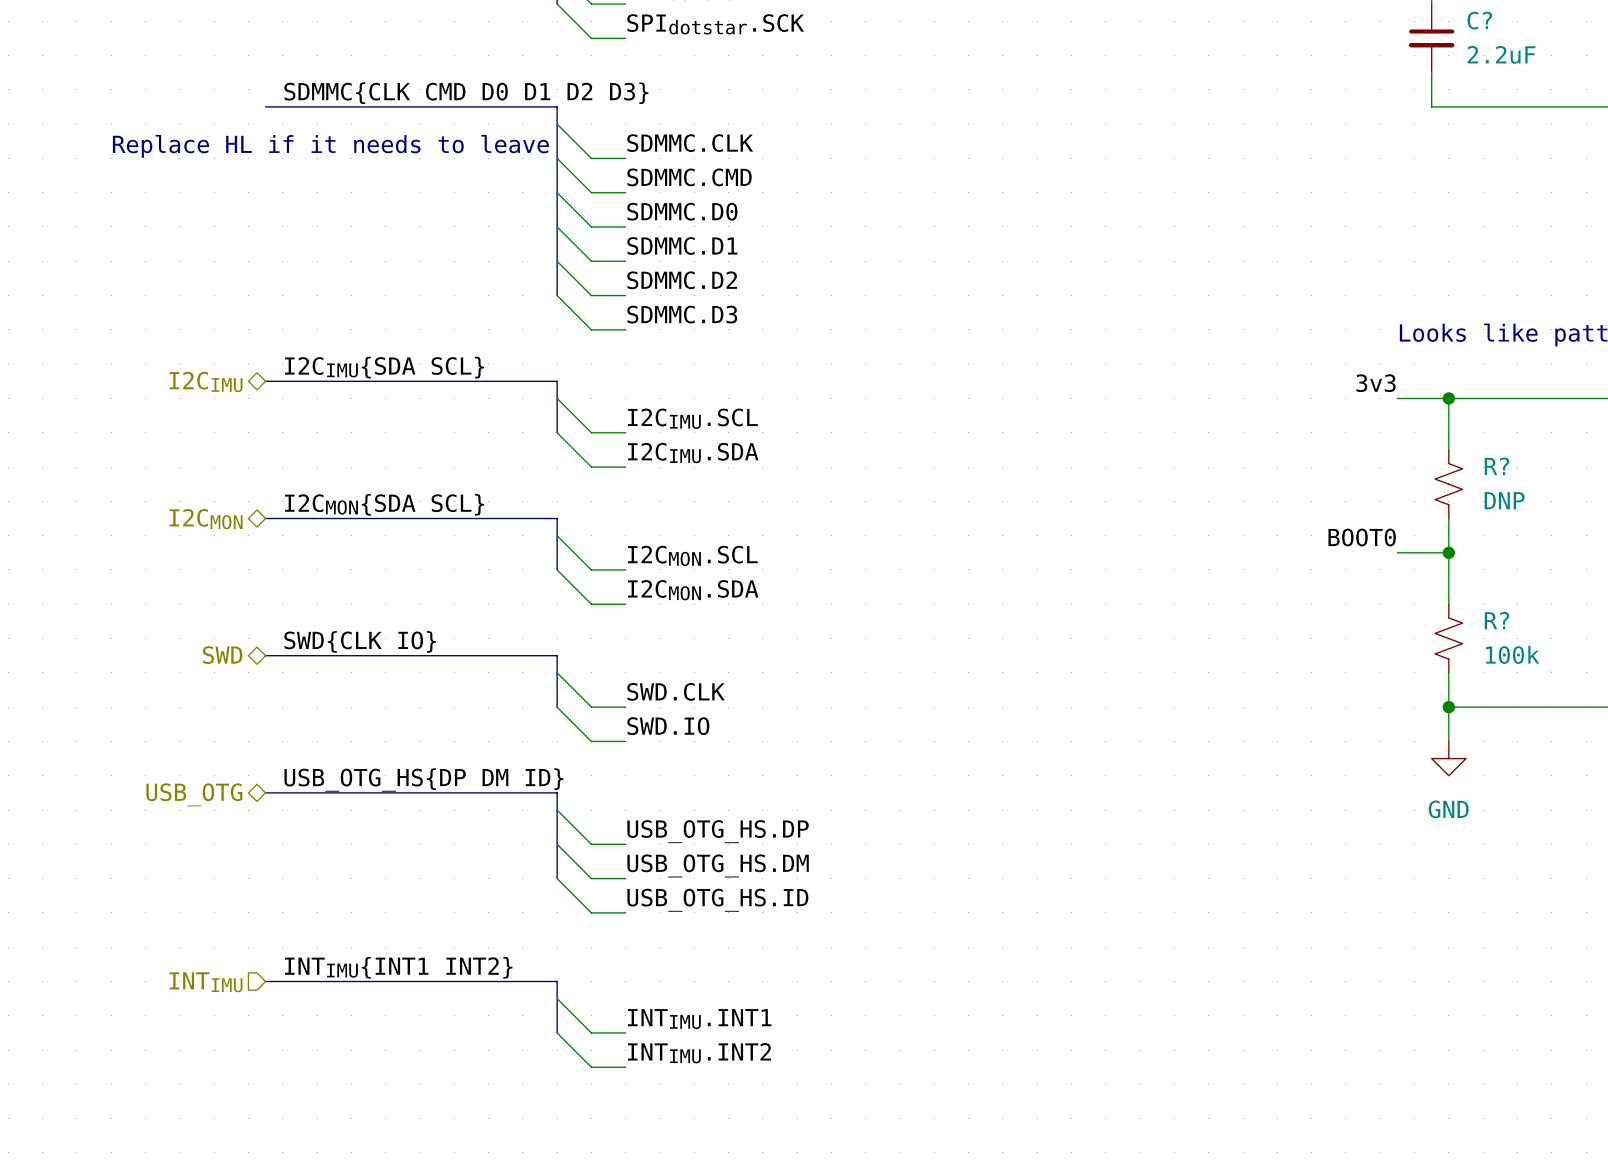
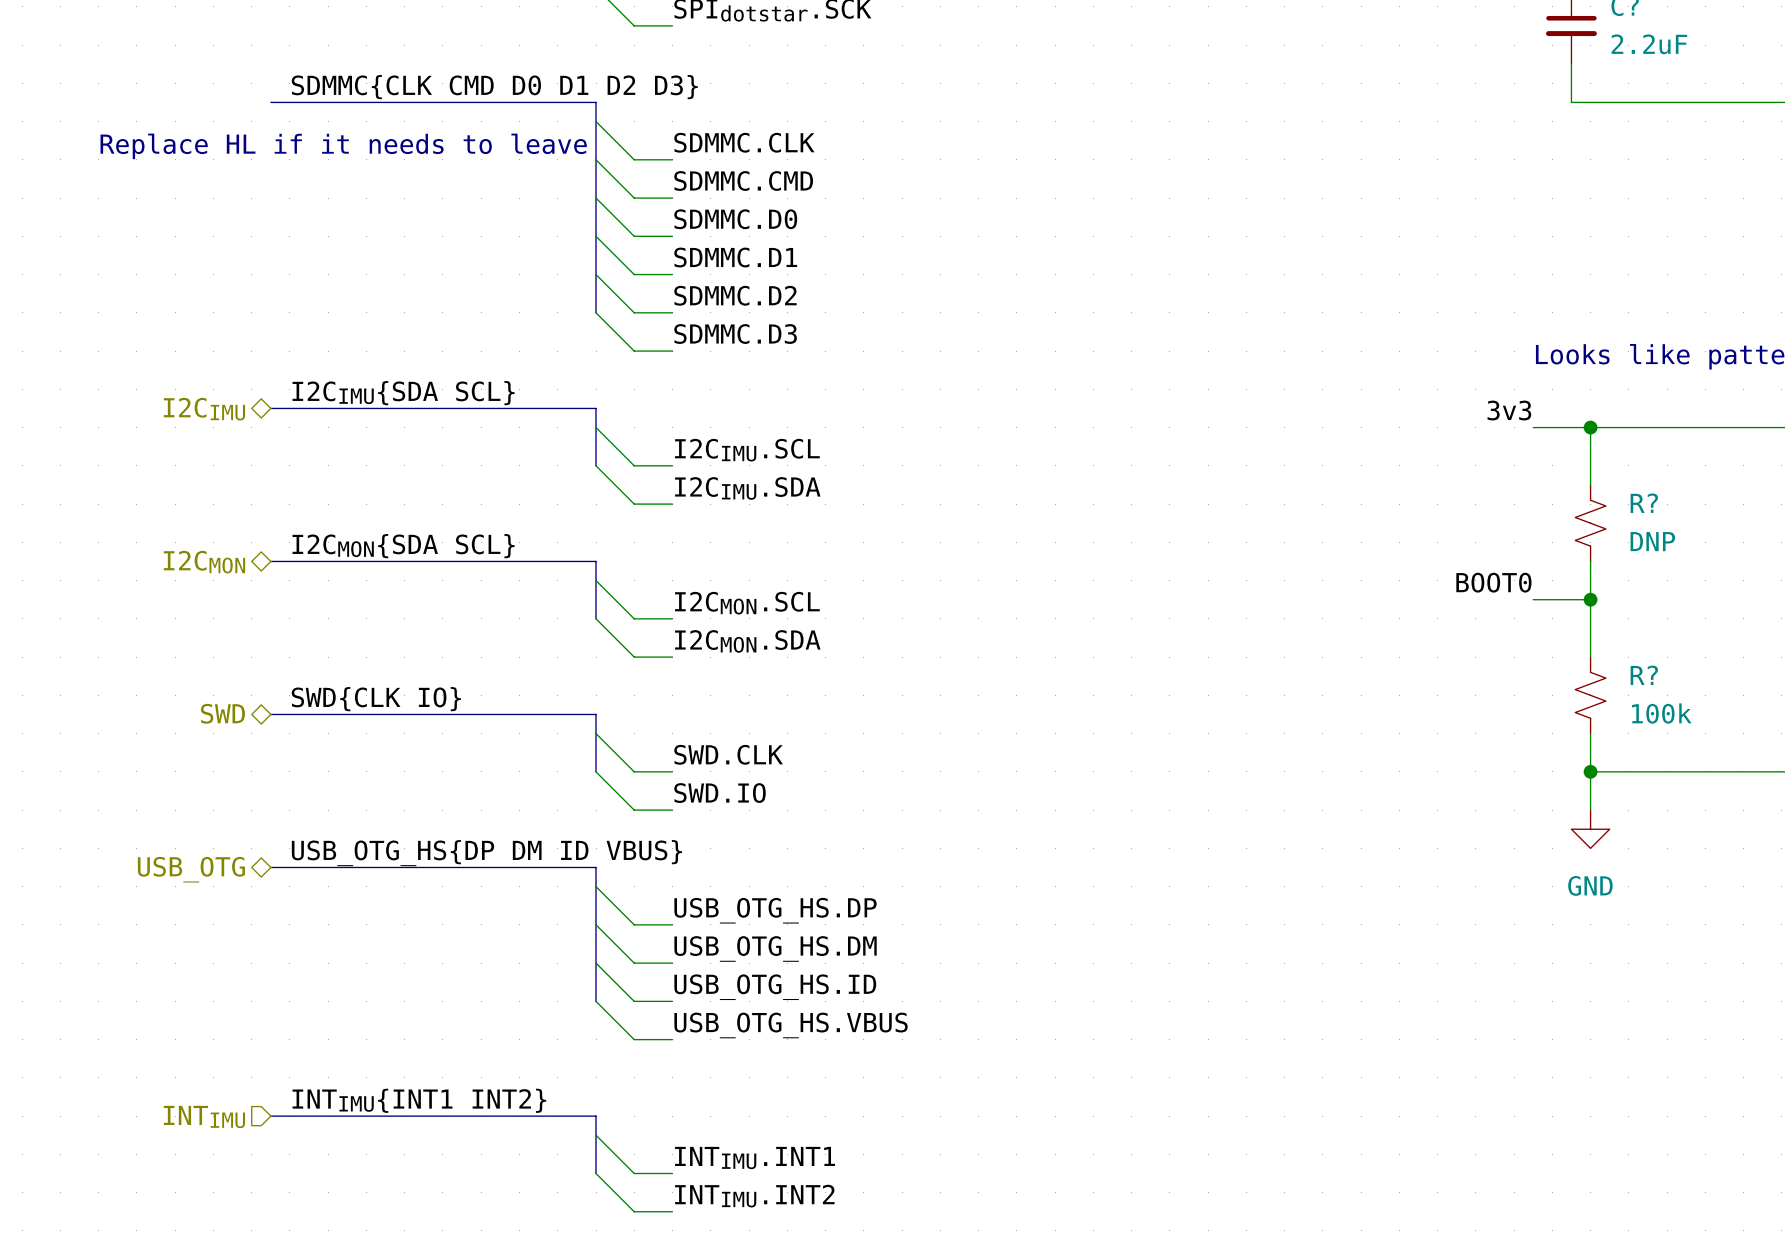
label: USB_OTG_HS{DP DM ID} (423, 779) -> USB_OTG_HS{DP DM ID VBUS} (486, 853)
bus: none -> (596, 963) (596, 1001)
wire: none -> (596, 1001) (634, 1039) (672, 1039)
label: none -> USB_OTG_HS.VBUS (791, 1025)
label position: INTIMU{INT1 INT2} (398, 967) -> INTIMU{INT1 INT2} (419, 1100)
bus: (265, 981) (557, 981) (557, 1015) -> (270, 1116) (596, 1116)
hierarchical label position: INTIMU (206, 982) -> INTIMU (204, 1116)
wire: (557, 998) (591, 1032) (625, 1032) -> (596, 1173) (634, 1211) (672, 1211)
label: INTIMU.INT1 (699, 1019) -> none
bus: none -> (596, 1135) (596, 1173)
label: INTIMU.INT2 (699, 1053) -> INTIMU.INT1 (755, 1158)
label: none -> INTIMU.INT2 (754, 1196)

